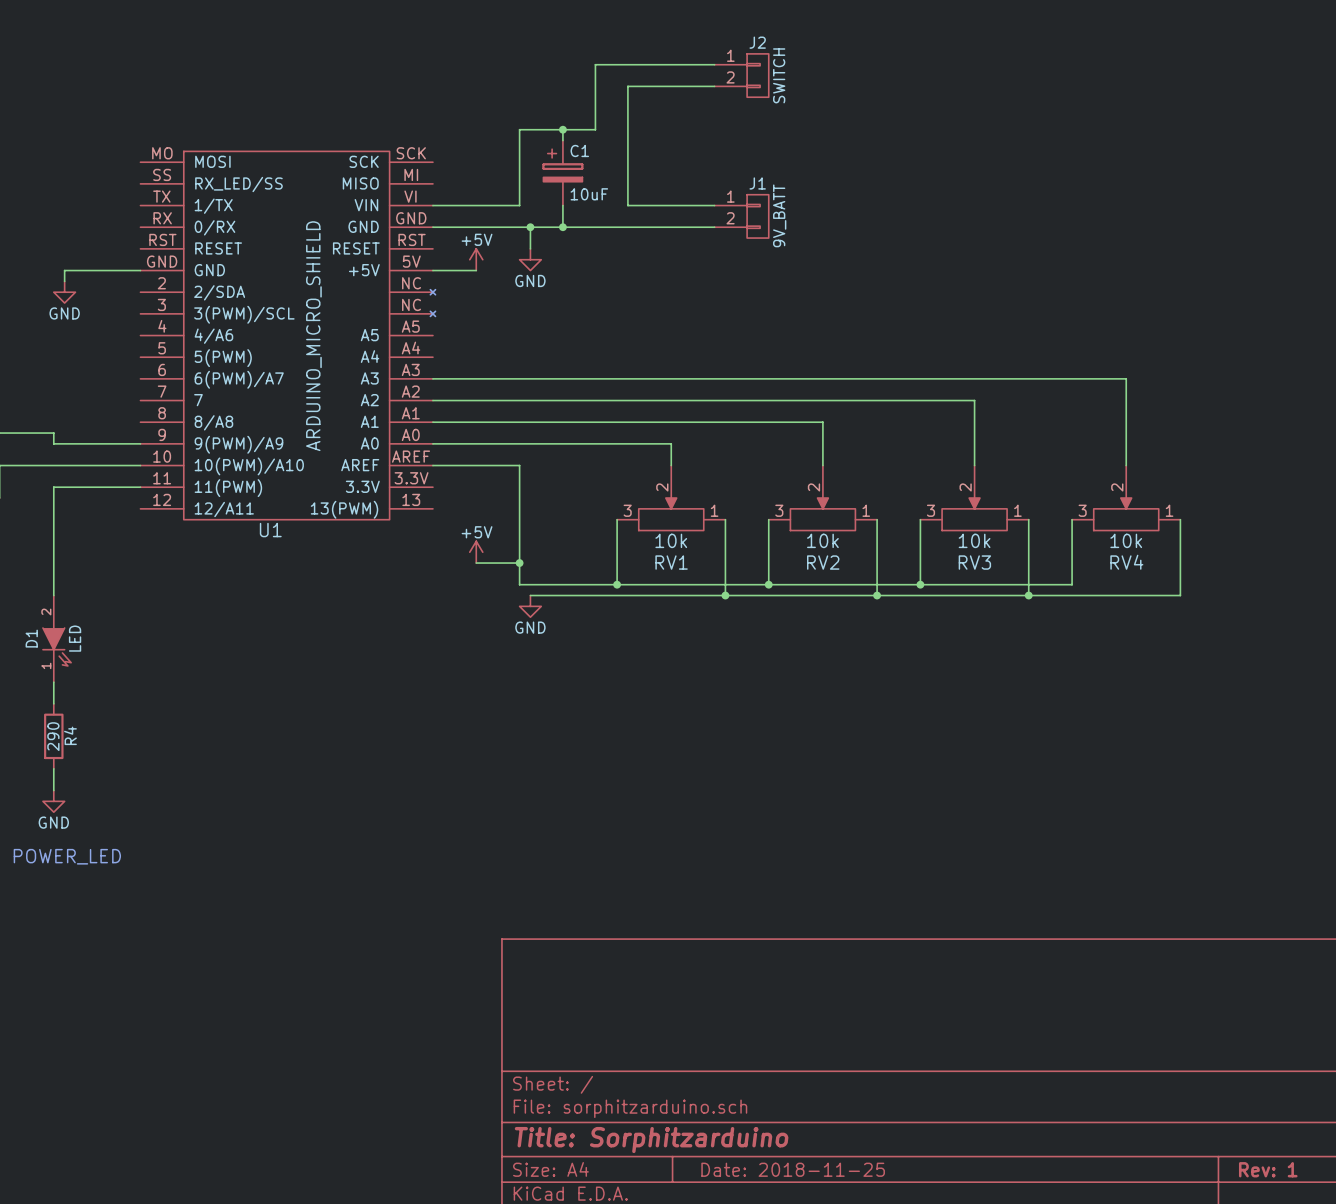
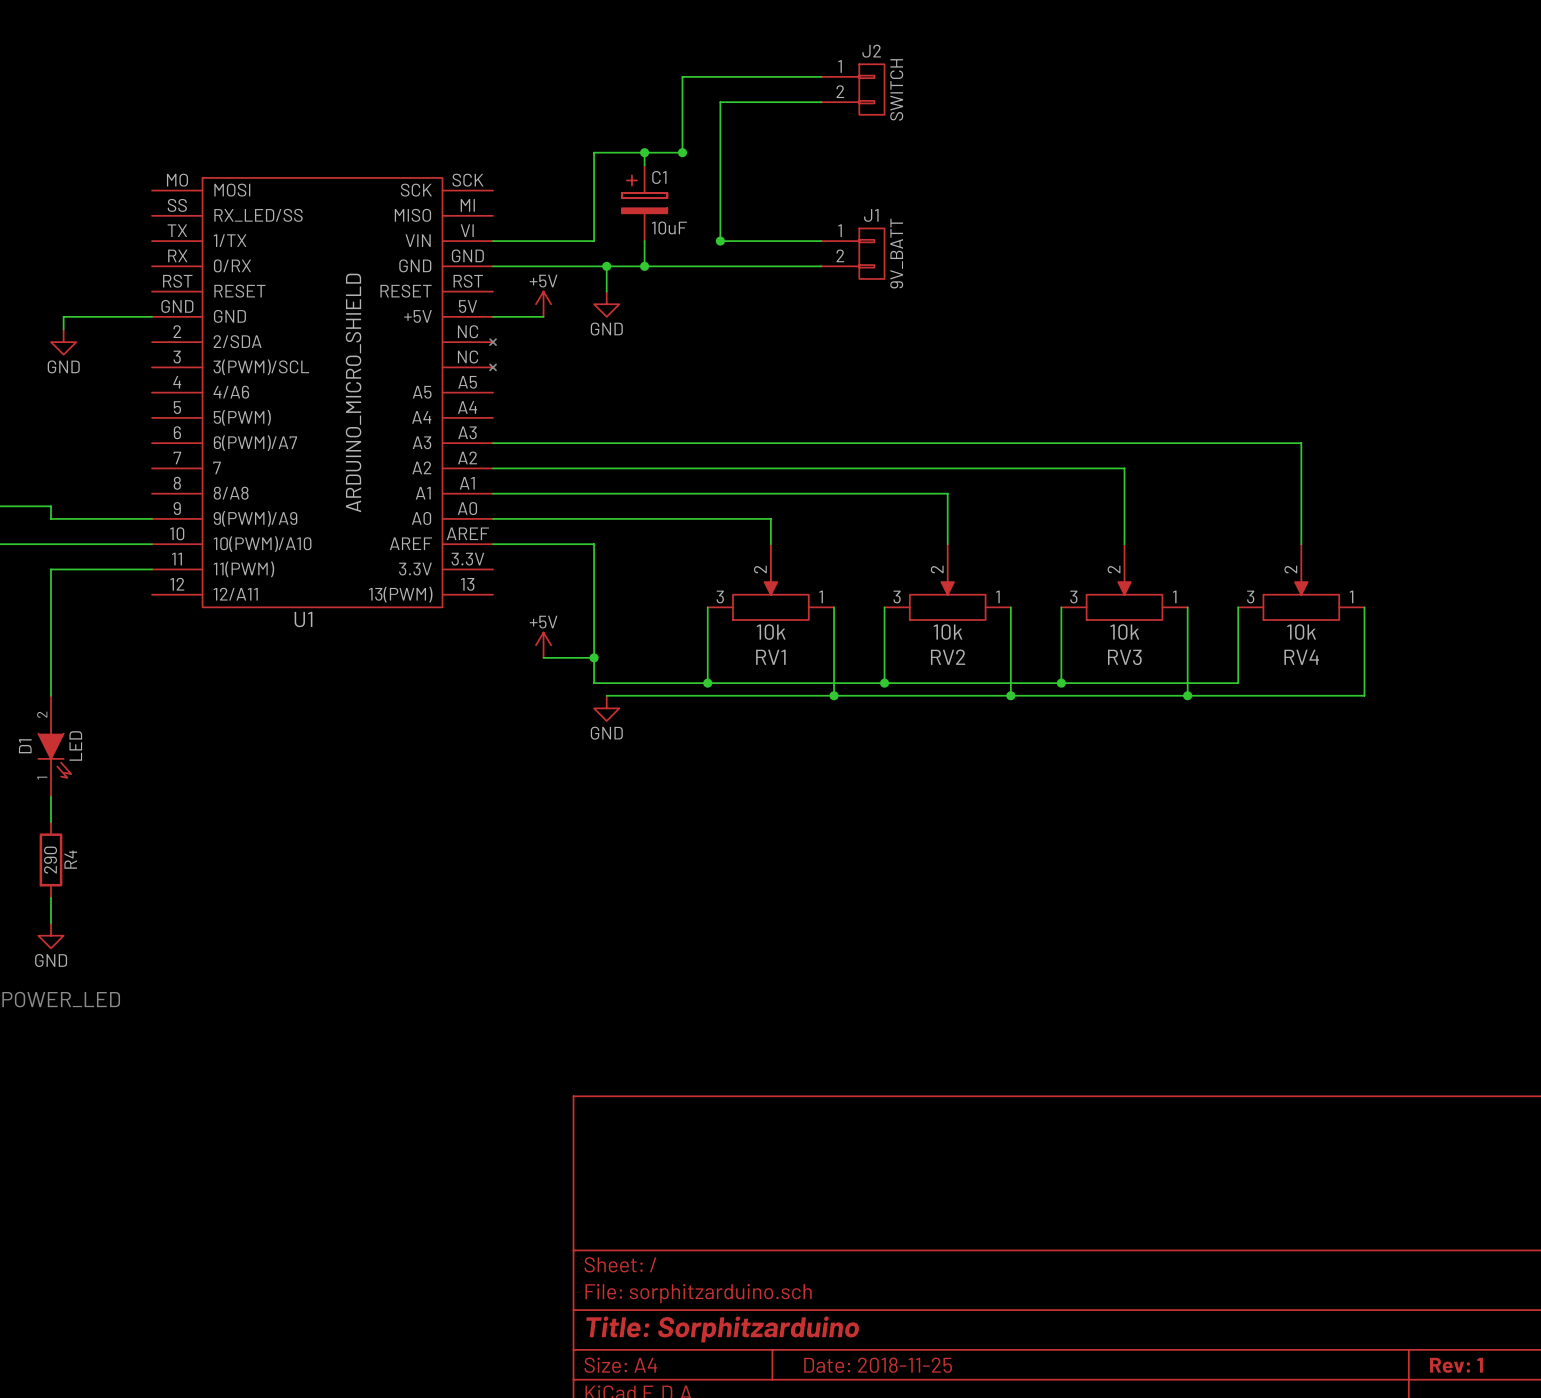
junction: none -> (682, 152)
junction: none -> (720, 241)

